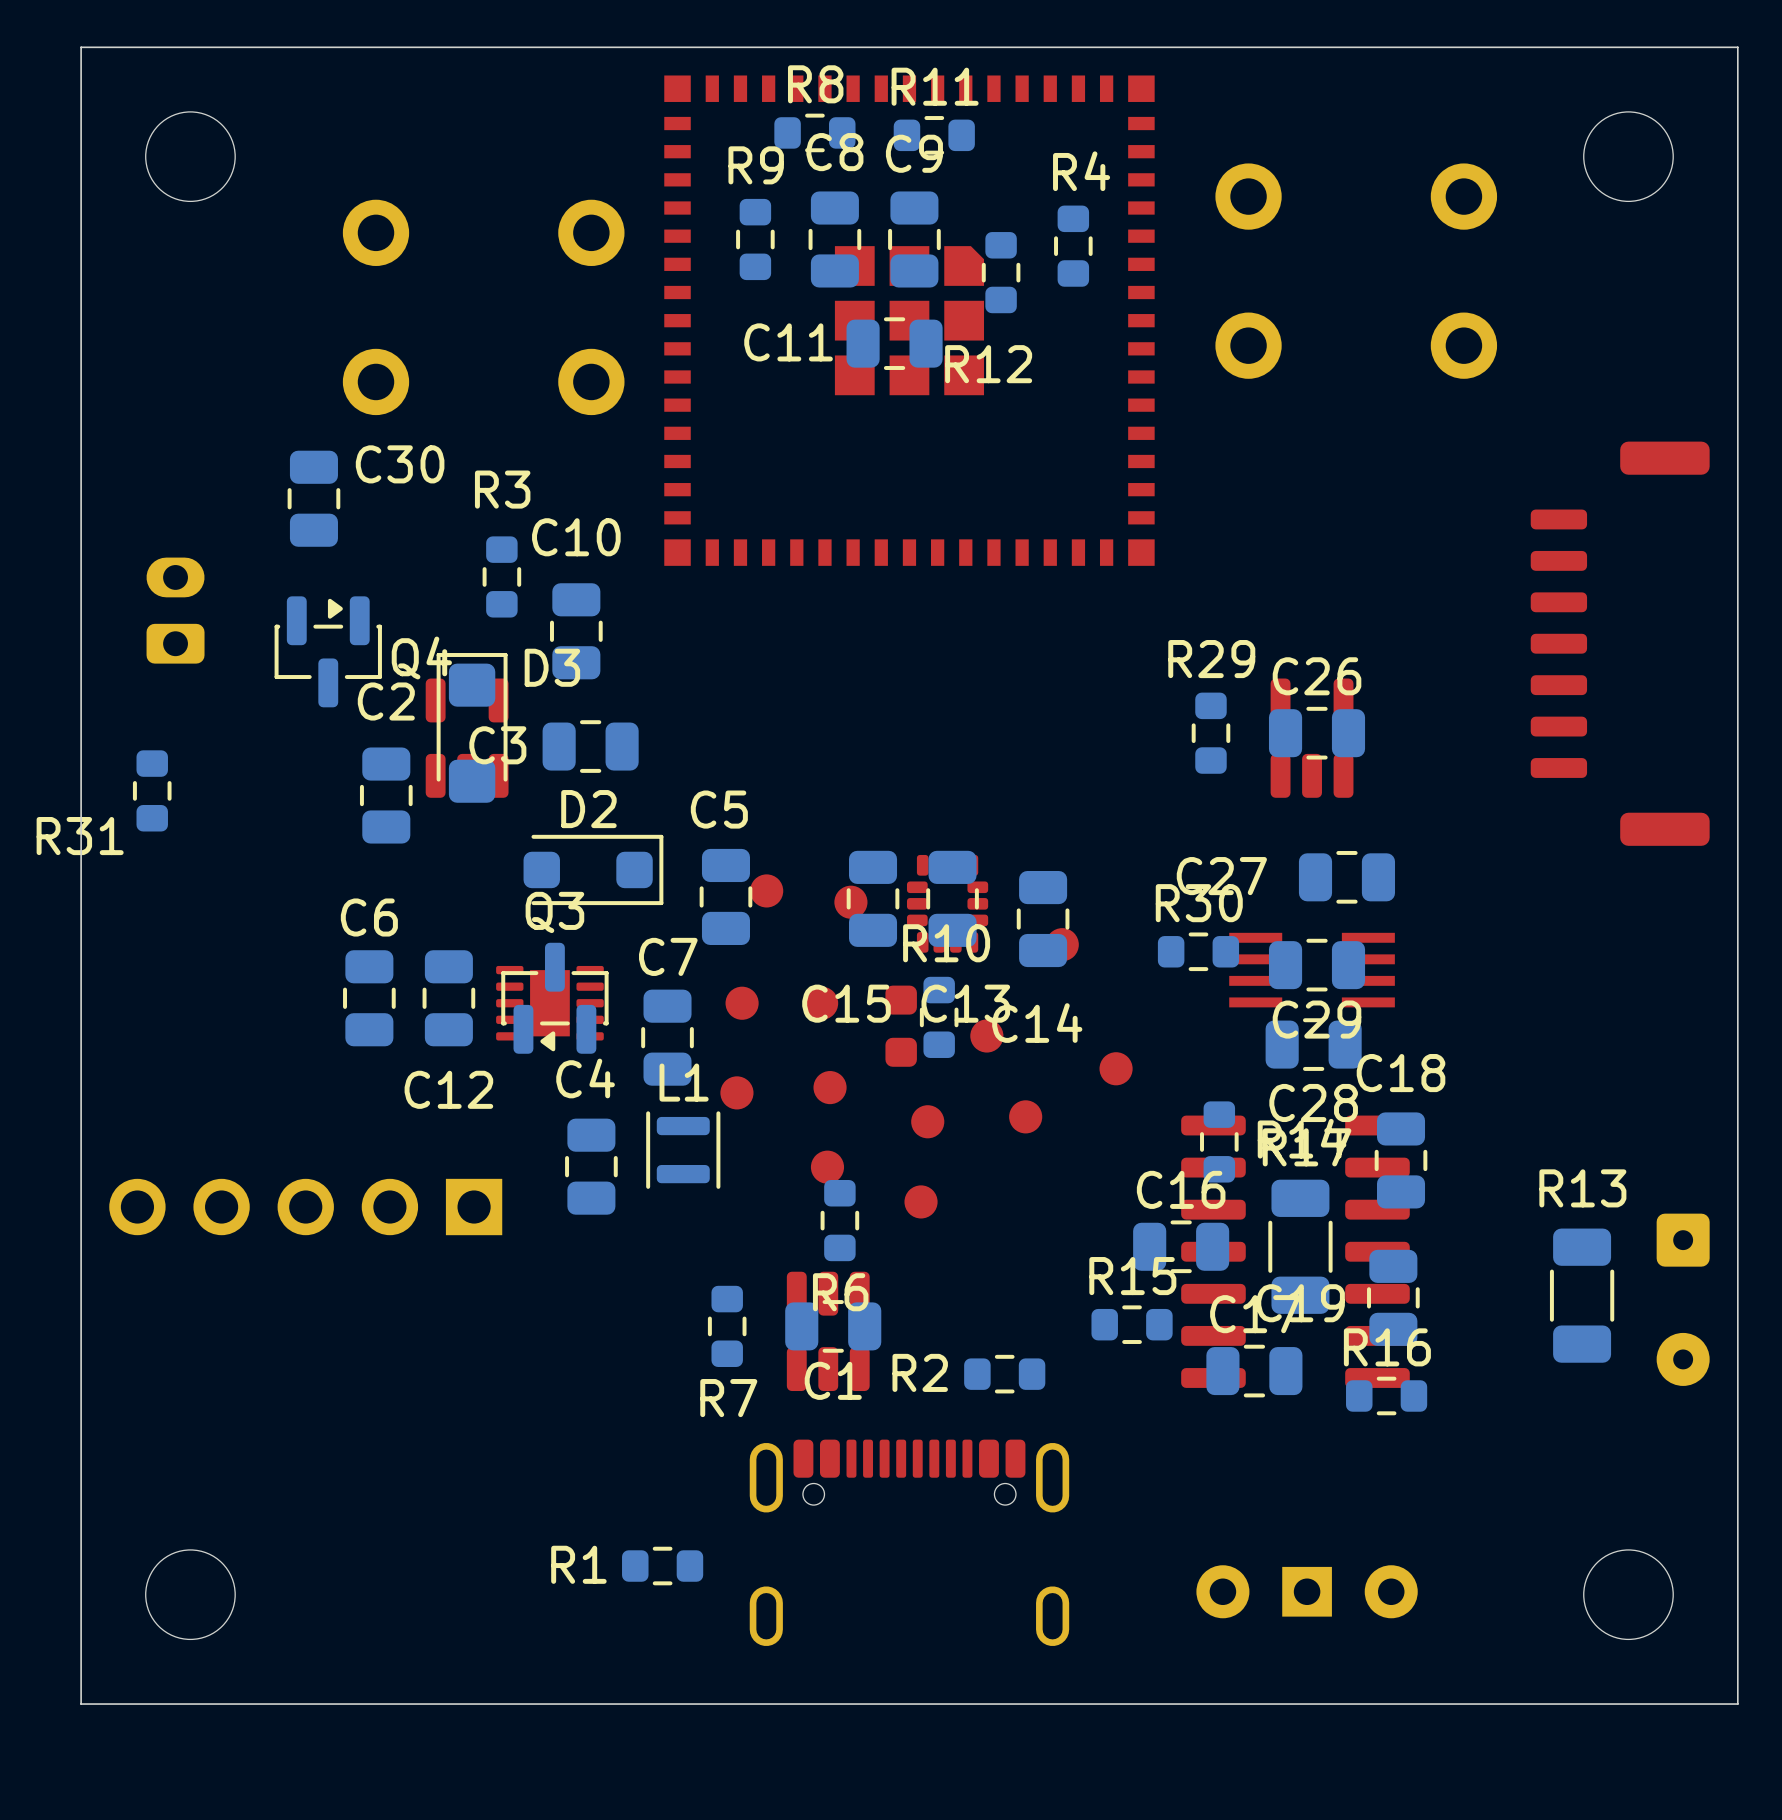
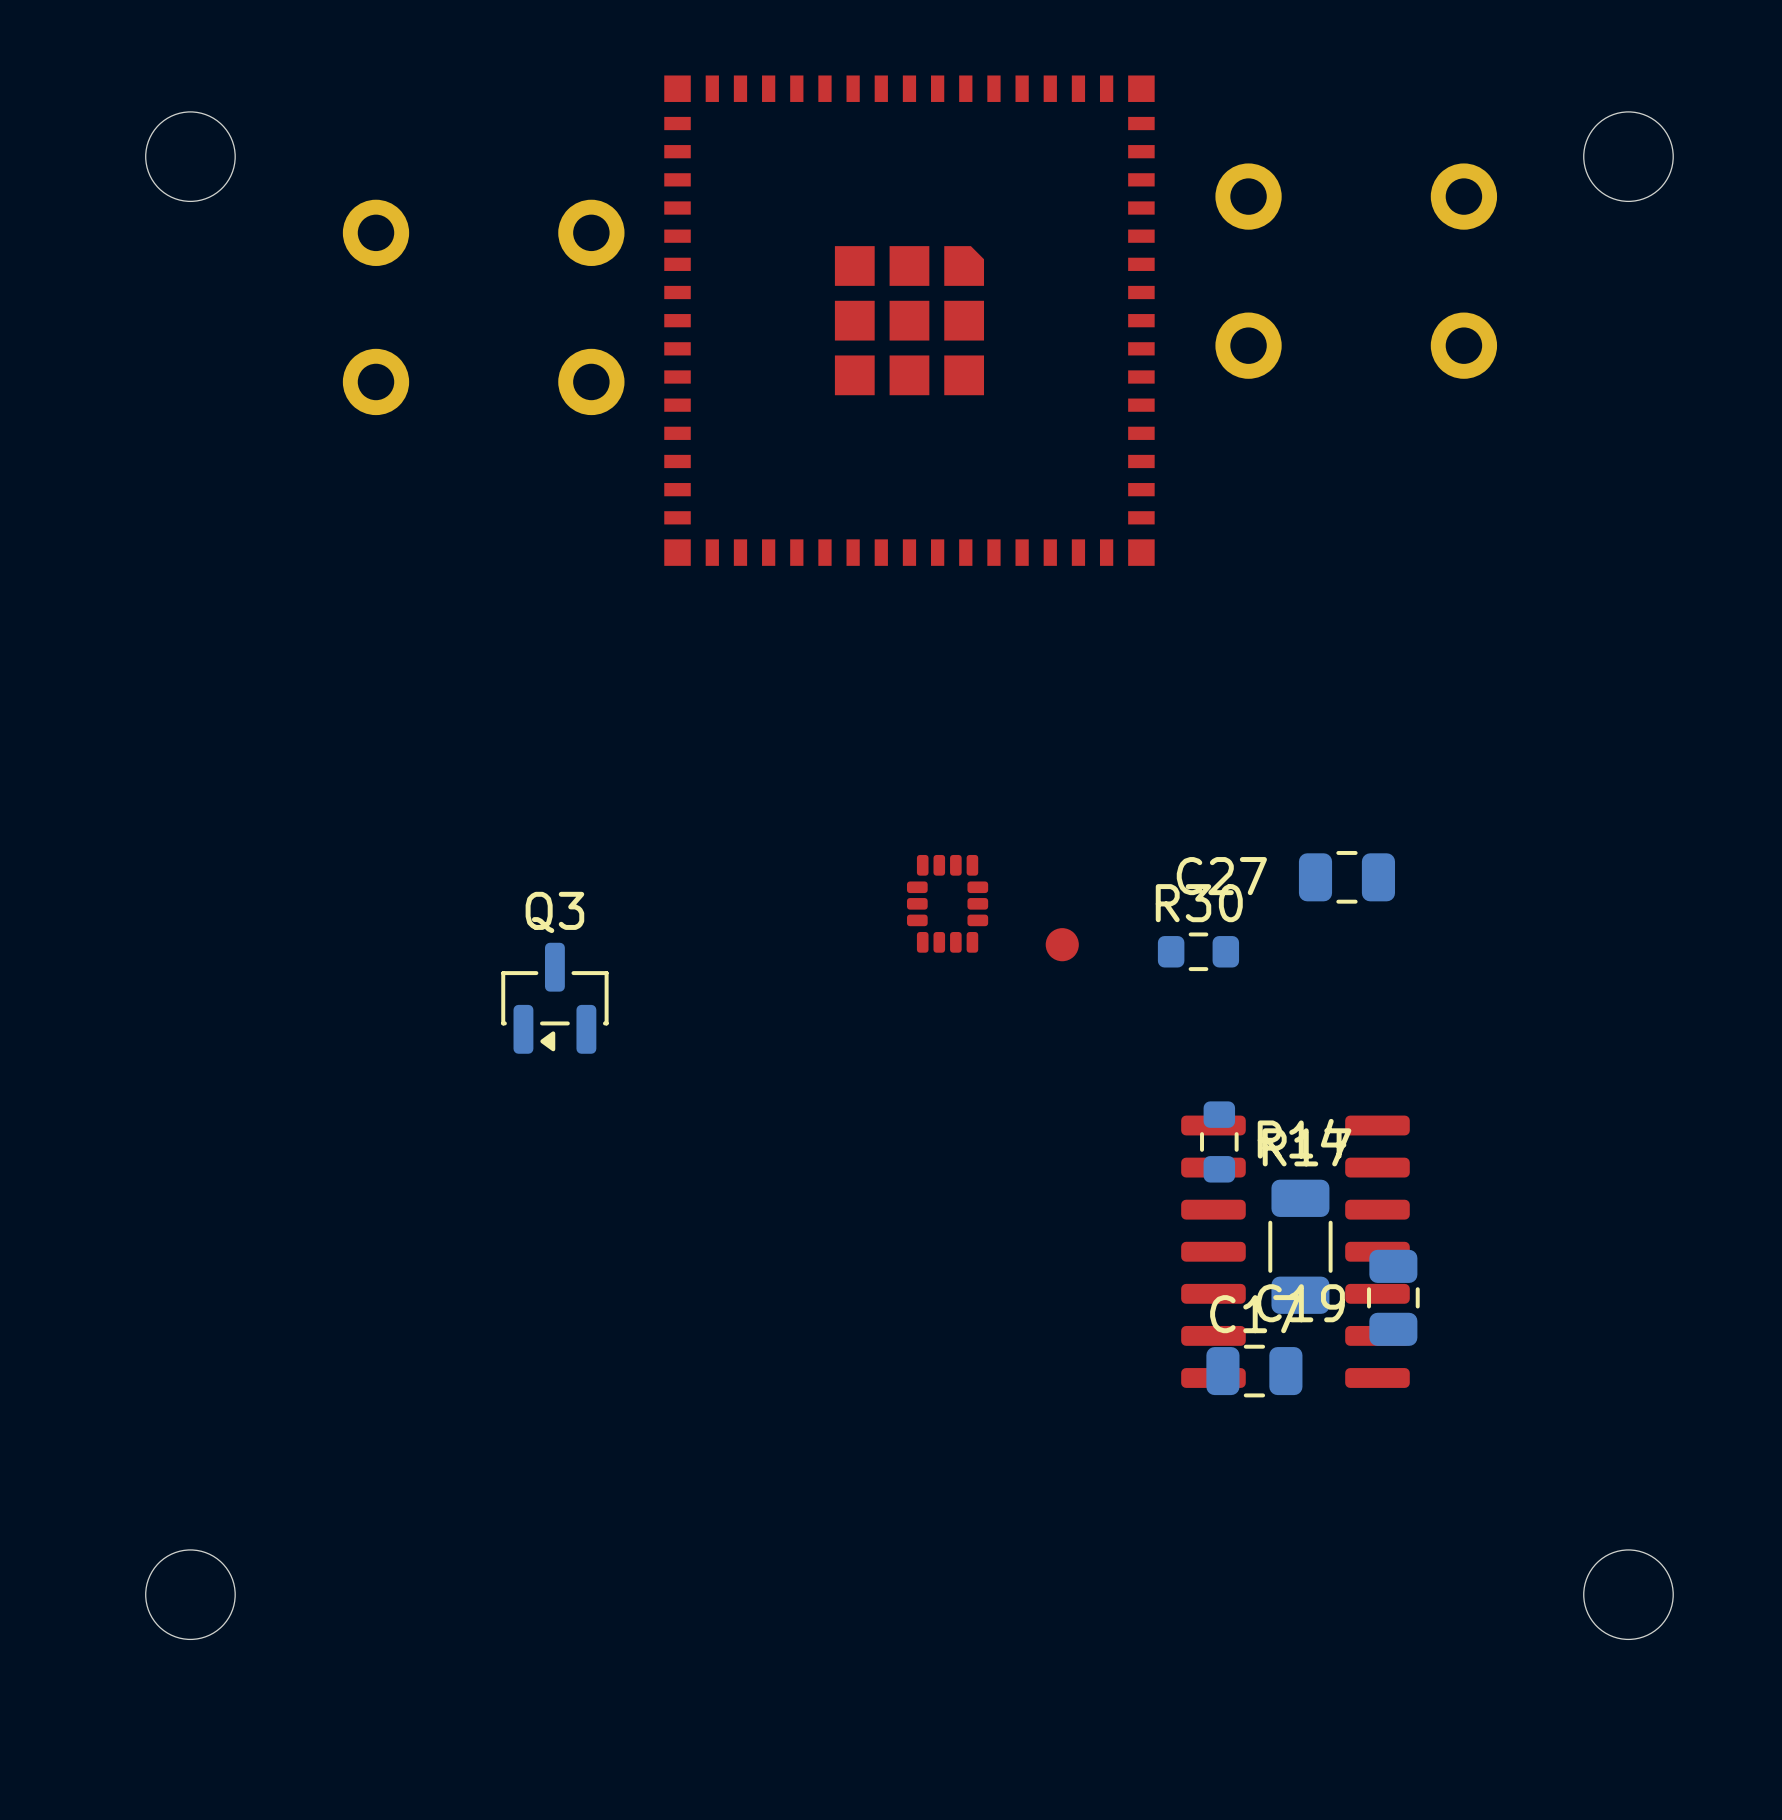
board edge: (1737, 47) (81, 47) (81, 1704) (1737, 1704) (1737, 47) -> none
R8: (814, 132) -> none
R11: (934, 135) -> none
R9: (755, 239) -> none
C8: (834, 239) -> none
C9: (914, 239) -> none
R4: (1073, 246) -> none
R12: (1001, 272) -> none
C11: (894, 343) -> none
C30: (313, 498) -> none
R3: (501, 576) -> none
part: (175, 610) -> none
C10: (576, 631) -> none
part: (1620, 643) -> none
Q4: (328, 651) -> none
D3: (472, 727) -> none
R29: (1210, 733) -> none
C26: (1317, 733) -> none
part: (467, 738) -> none
part: (1312, 738) -> none
C3: (590, 746) -> none
R31: (152, 790) -> none
C2: (386, 795) -> none
D2: (593, 869) -> none
part: (766, 890) -> none
C5: (725, 896) -> none
C15: (873, 898) -> none
C13: (952, 898) -> none
part: (850, 902) -> none
C14: (1043, 919) -> none
C29: (1317, 965) -> none
part: (1312, 970) -> none
C6: (369, 998) -> none
C12: (448, 998) -> none
part: (549, 1003) -> none
part: (742, 1003) -> none
part: (821, 1003) -> none
R10: (939, 1017) -> none
part: (901, 1026) -> none
part: (986, 1035) -> none
C7: (667, 1037) -> none
C28: (1313, 1044) -> none
part: (1116, 1068) -> none
part: (830, 1087) -> none
part: (736, 1092) -> none
part: (1025, 1116) -> none
part: (927, 1121) -> none
L1: (683, 1150) -> none
C18: (1401, 1160) -> none
C4: (591, 1166) -> none
part: (827, 1167) -> none
part: (921, 1201) -> none
part: (305, 1207) -> none
R6: (839, 1220) -> none
C16: (1181, 1246) -> none
R13: (1582, 1295) -> none
part: (1683, 1299) -> none
R15: (1132, 1324) -> none
R7: (727, 1326) -> none
C1: (833, 1326) -> none
part: (828, 1331) -> none
R2: (1004, 1374) -> none
R16: (1386, 1395) -> none
part: (909, 1542) -> none
R1: (662, 1566) -> none
part: (1307, 1591) -> none

